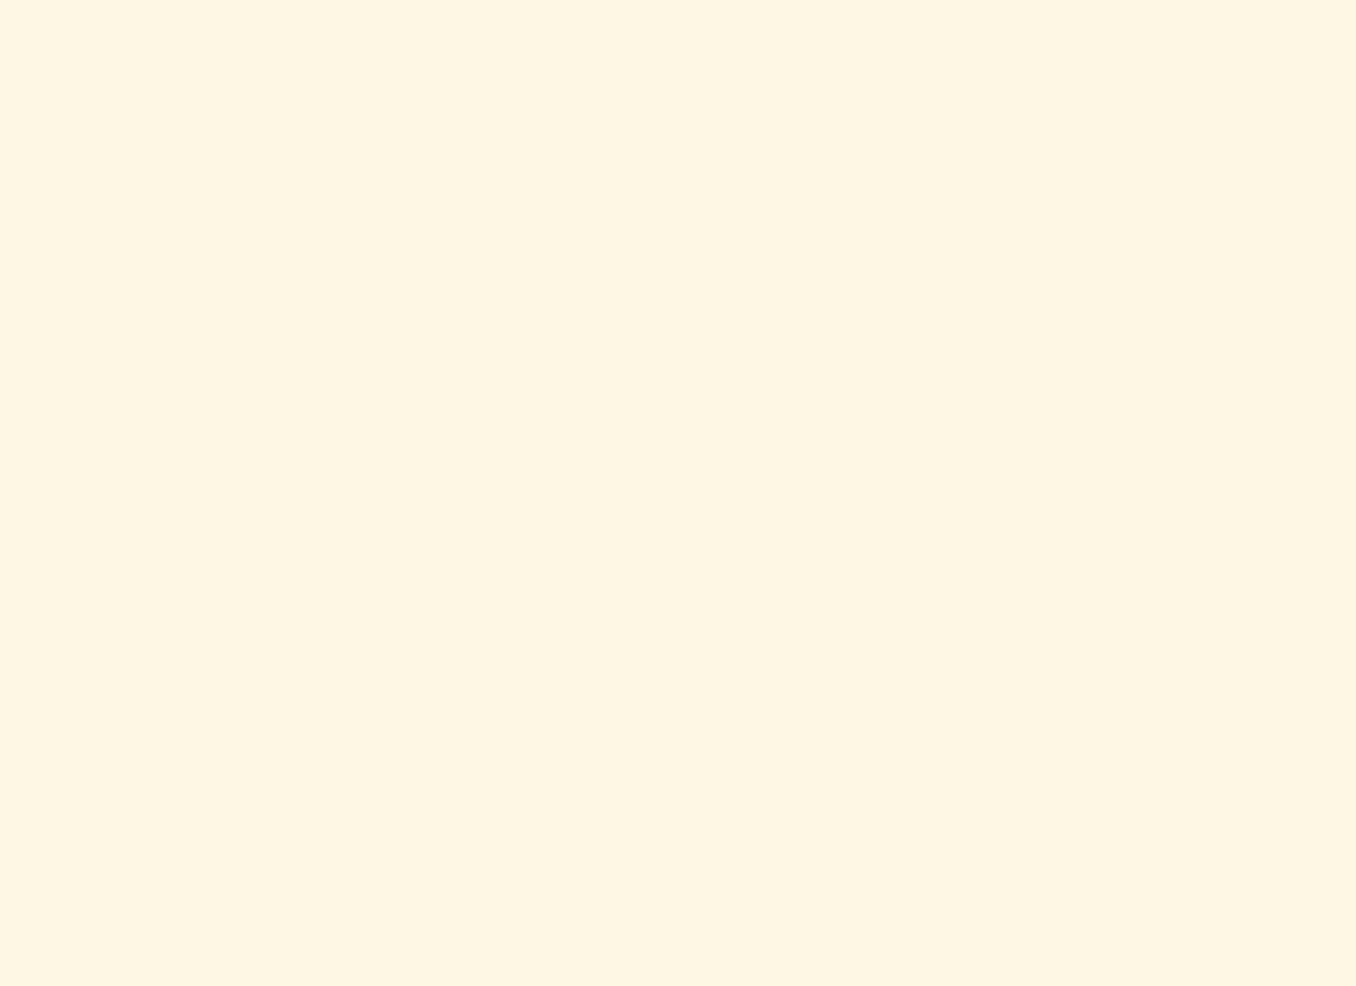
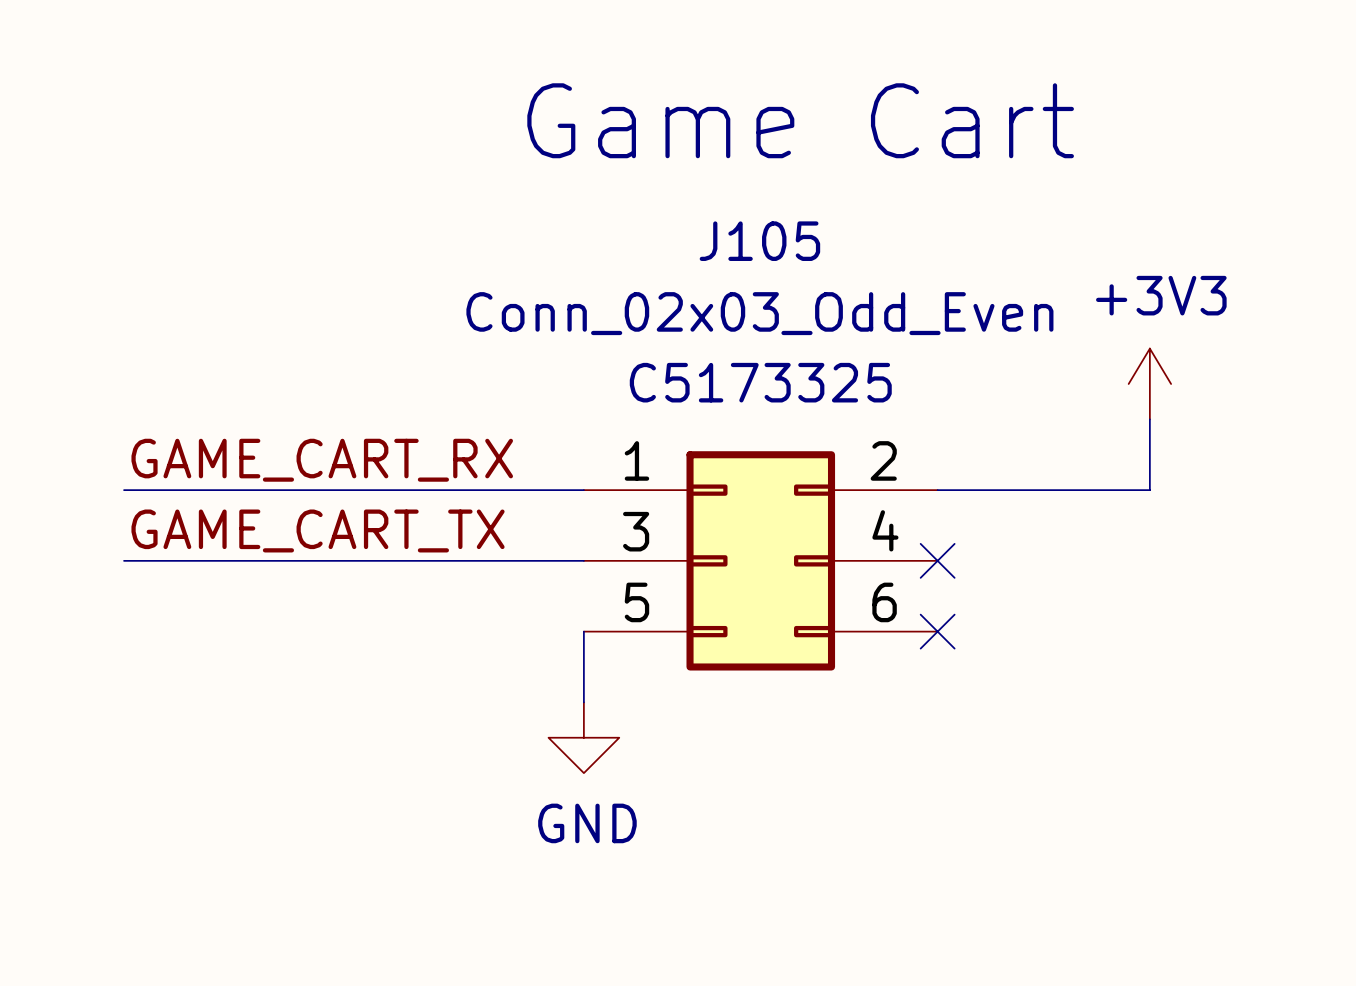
text: none -> Game Cart (800, 120)
power symbol: none -> +3V3 (1149, 383)
wire: none -> (1149, 419) (1149, 490) (937, 490)
label: none -> GAME_CART_RX (322, 460)
wire: none -> (124, 490) (583, 490)
label: none -> GAME_CART_TX (318, 530)
wire: none -> (124, 560) (583, 560)
J105: none -> Conn_02x03_Odd_Even (760, 560)
no-connect mark: none -> (937, 560)
wire: none -> (583, 631) (583, 702)
no-connect mark: none -> (937, 631)
power symbol: none -> GND (583, 737)

